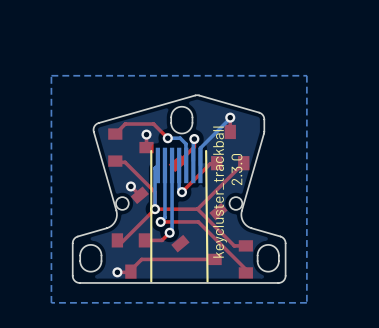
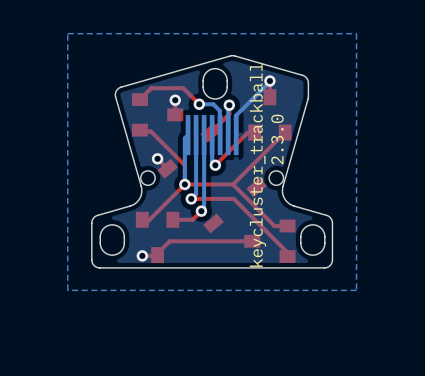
line: (151, 150) (151, 281) -> none
line: (206, 150) (207, 281) -> none

